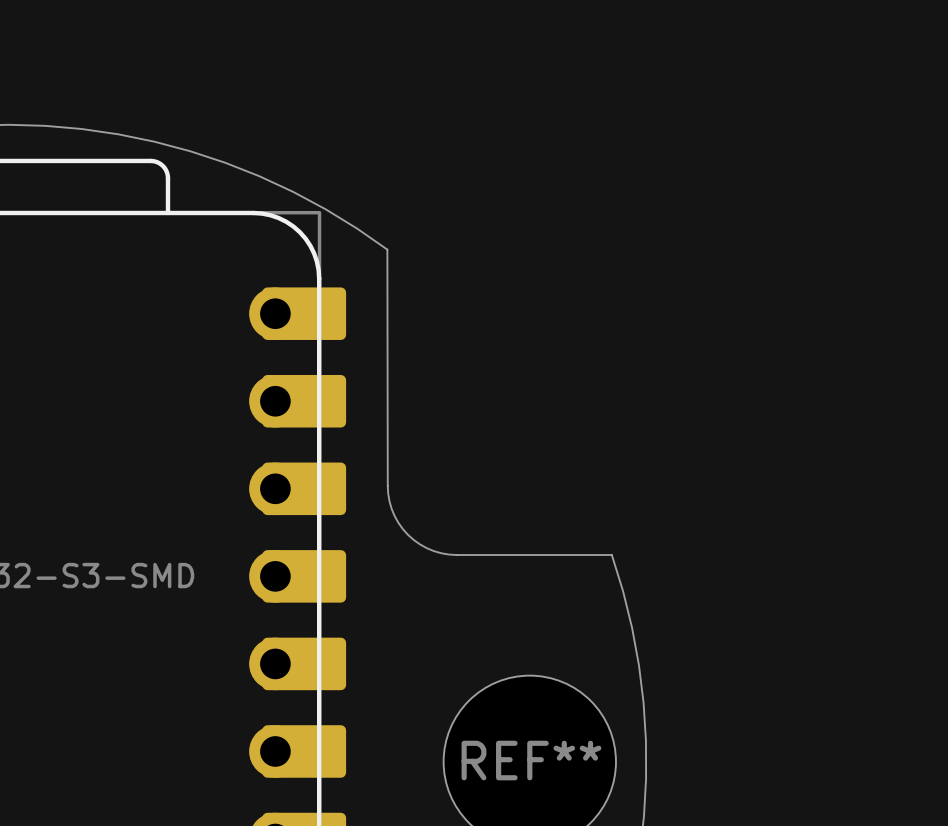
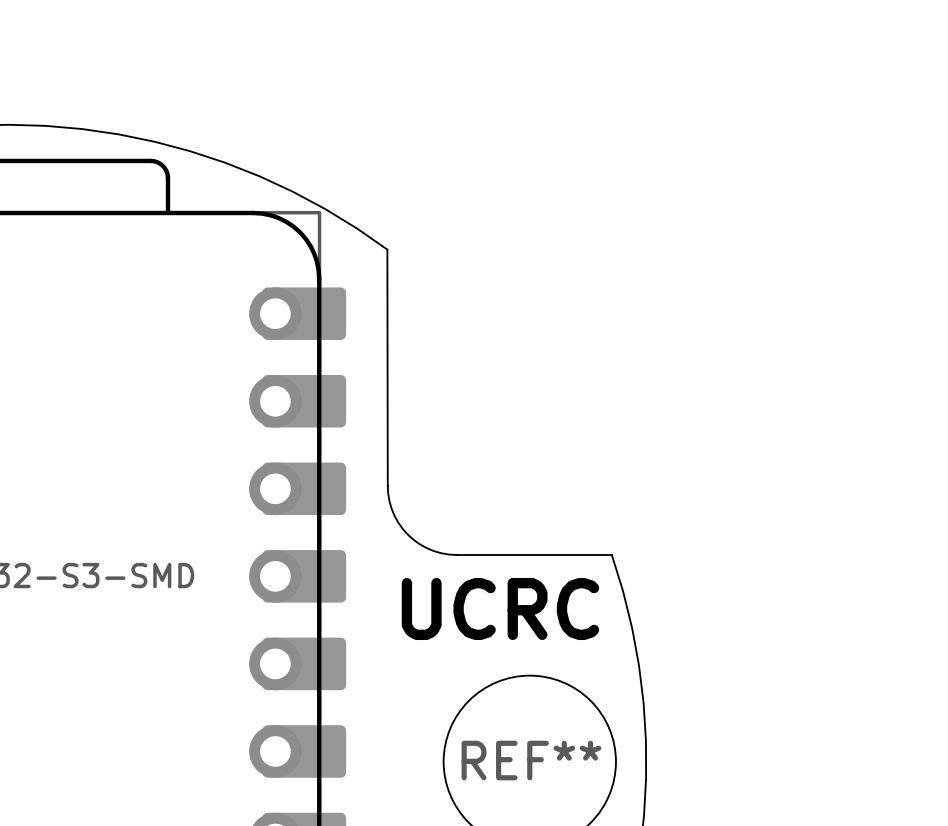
text: none -> UCRC (500, 608)

